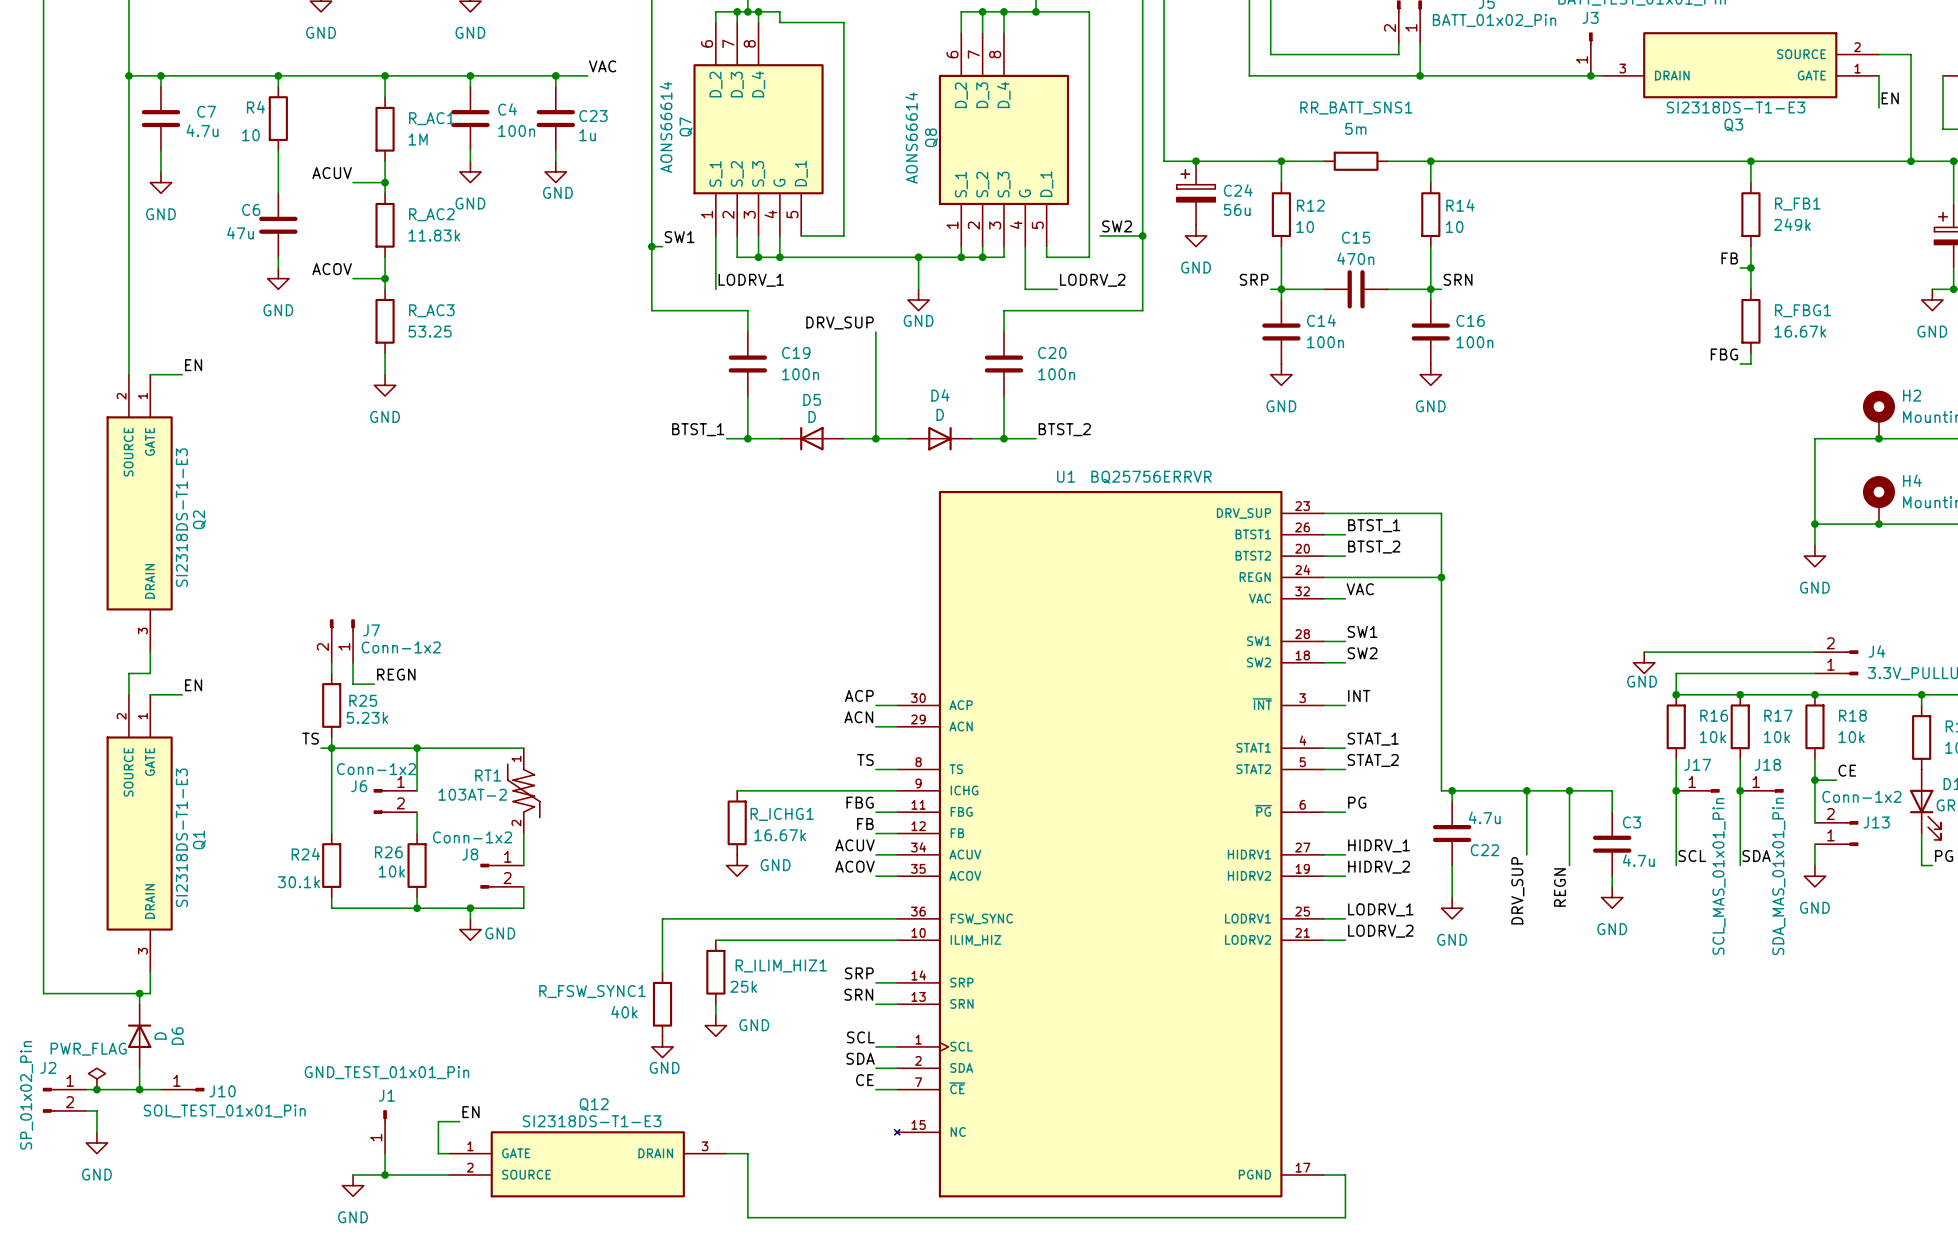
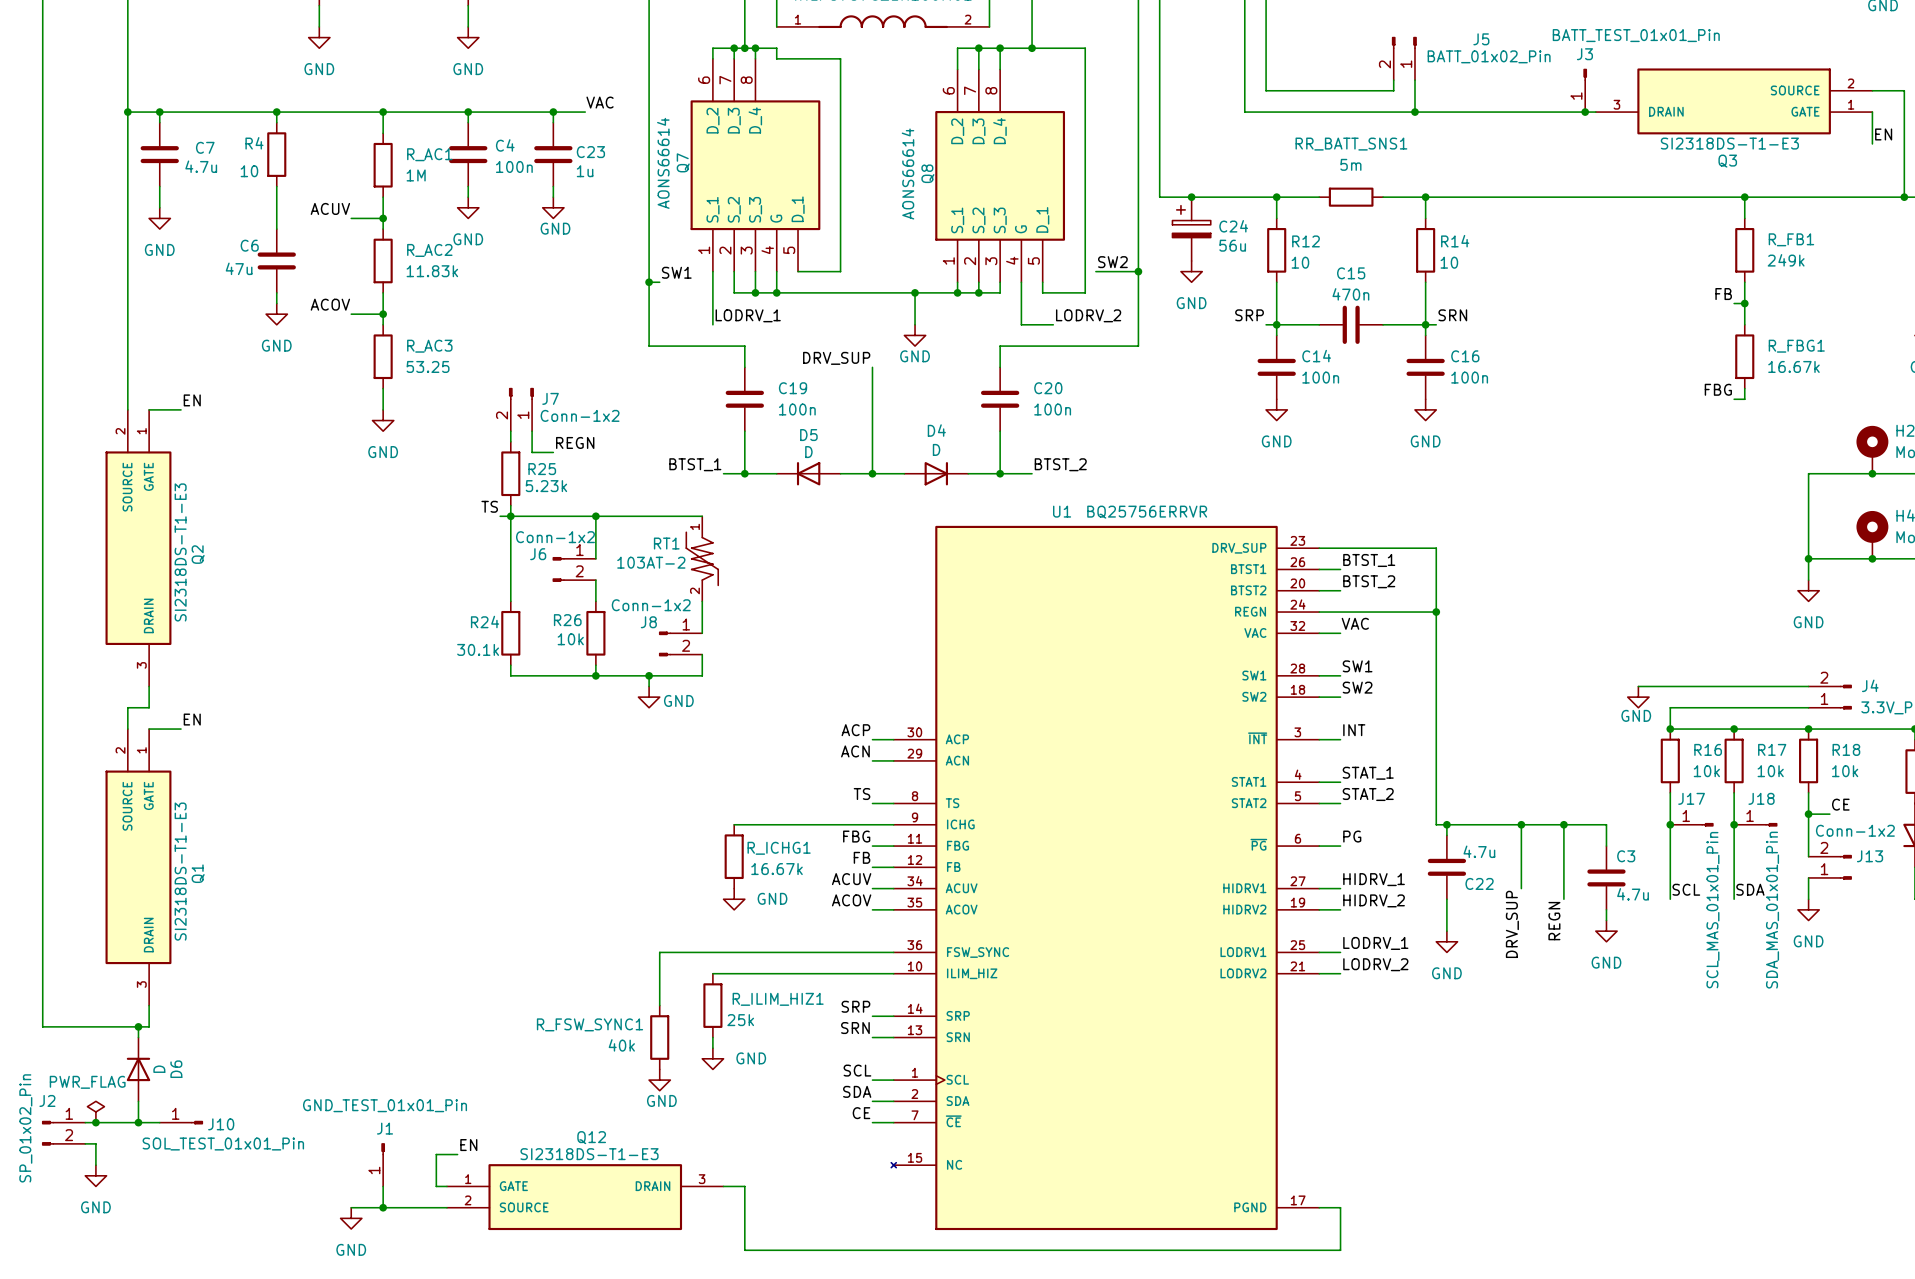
wire: none -> (510, 431) (510, 441)
wire: none -> (532, 431) (532, 452) (553, 452)
label: none -> REGN (575, 442)
wire: none -> (510, 505) (510, 601)
label: none -> TS (489, 506)
wire: none -> (500, 516) (702, 516)
junction: none -> (510, 516)
wire: none -> (595, 516) (595, 558)
junction: none -> (595, 516)
wire: none -> (595, 580) (595, 601)
wire: none -> (702, 601) (702, 633)
wire: none -> (702, 654) (702, 675) (510, 675) (510, 665)
wire: none -> (595, 665) (595, 675)
J7 position: (342, 641) -> (521, 409)
junction: none -> (595, 675)
wire: none -> (649, 675) (649, 686)
junction: none -> (649, 675)
wire: (331, 662) (331, 673) -> none
wire: (353, 662) (353, 684) (374, 684) -> none
power symbol: none -> GND (649, 697)
label: REGN (396, 674) -> none
R25 position: (331, 705) -> (510, 473)
wire: (331, 737) (331, 833) -> none
label: TS (310, 738) -> none
wire: (321, 748) (523, 748) -> none
junction: (331, 748) -> none
wire: (417, 748) (417, 790) -> none
junction: (417, 748) -> none
RT1 position: (523, 790) -> (702, 558)
J6 position: (395, 801) -> (574, 569)
wire: (417, 812) (417, 833) -> none
wire: (523, 833) (523, 865) -> none
R24 position: (331, 865) -> (510, 633)
R26 position: (417, 865) -> (595, 633)
J8 position: (502, 876) -> (680, 643)
wire: (523, 886) (523, 908) (331, 908) (331, 897) -> none
wire: (417, 897) (417, 908) -> none
junction: (417, 908) -> none
wire: (470, 908) (470, 918) -> none
junction: (470, 908) -> none
power symbol: GND (470, 929) -> none

